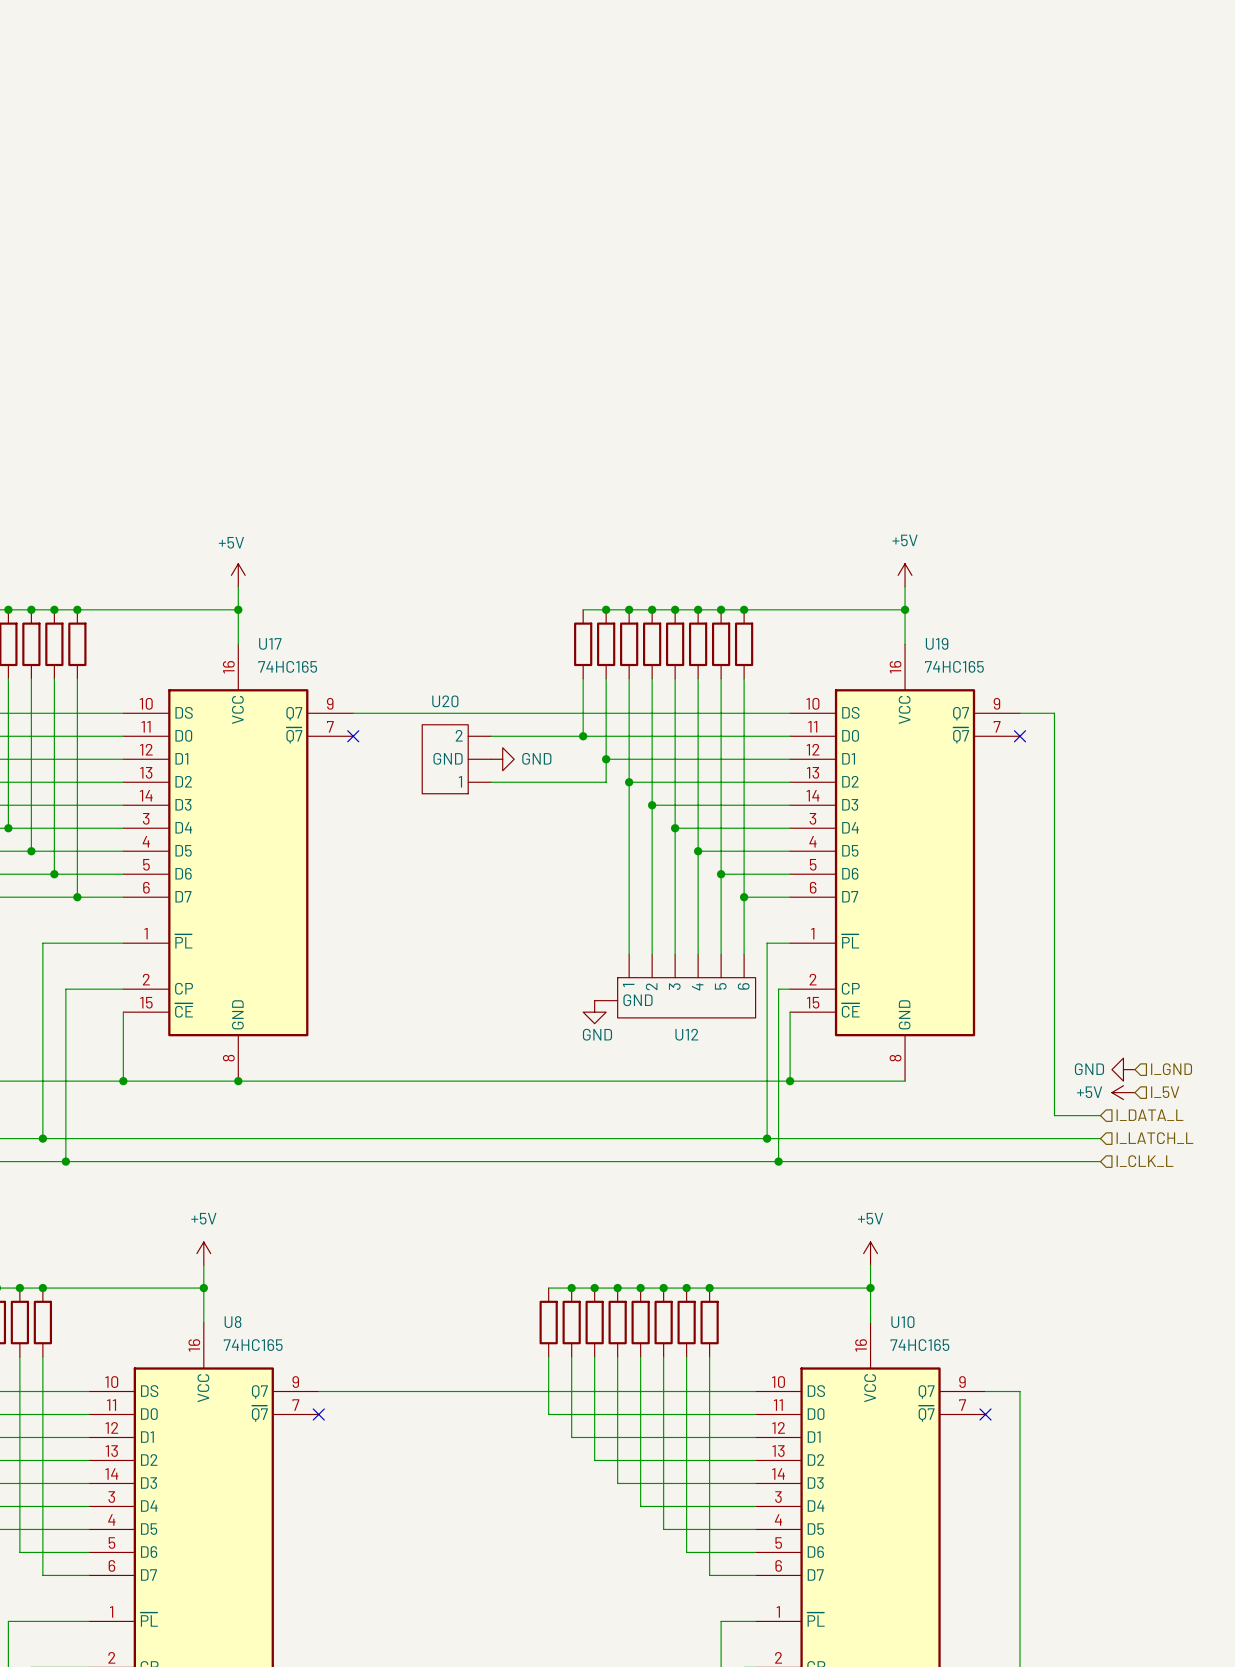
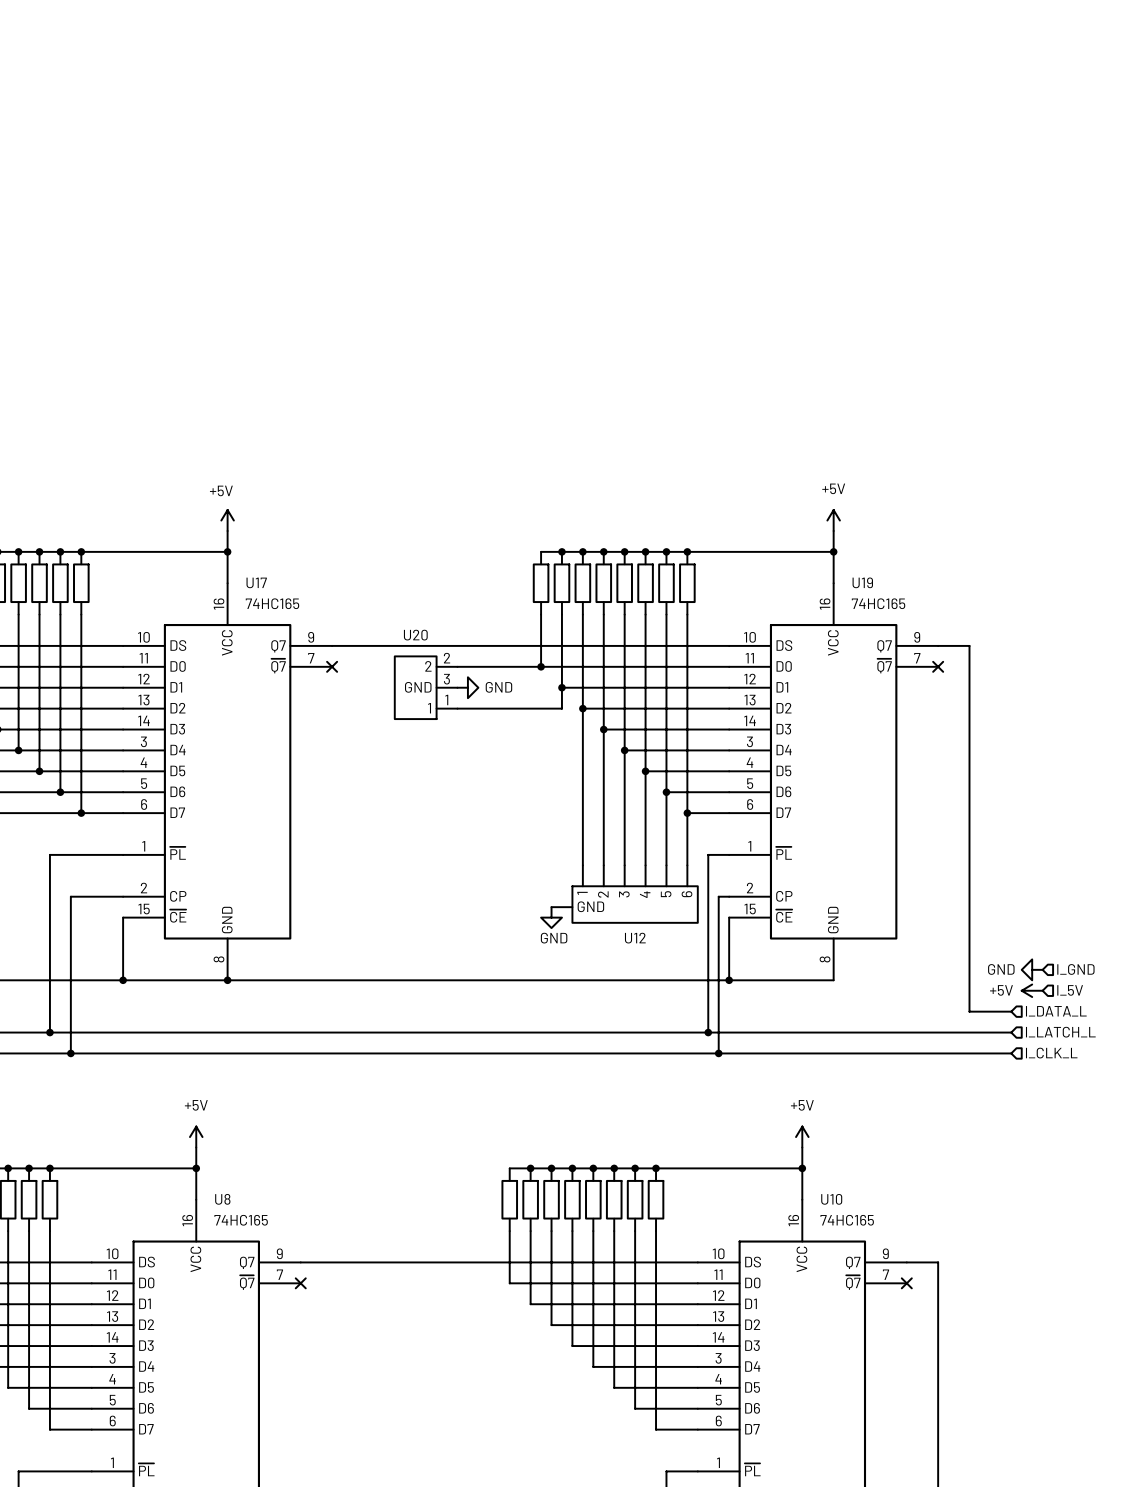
U20 pin number: none -> 2 (447, 658)
U20 pin number: none -> 3 (446, 679)
U20 pin number: none -> 1 (446, 700)

